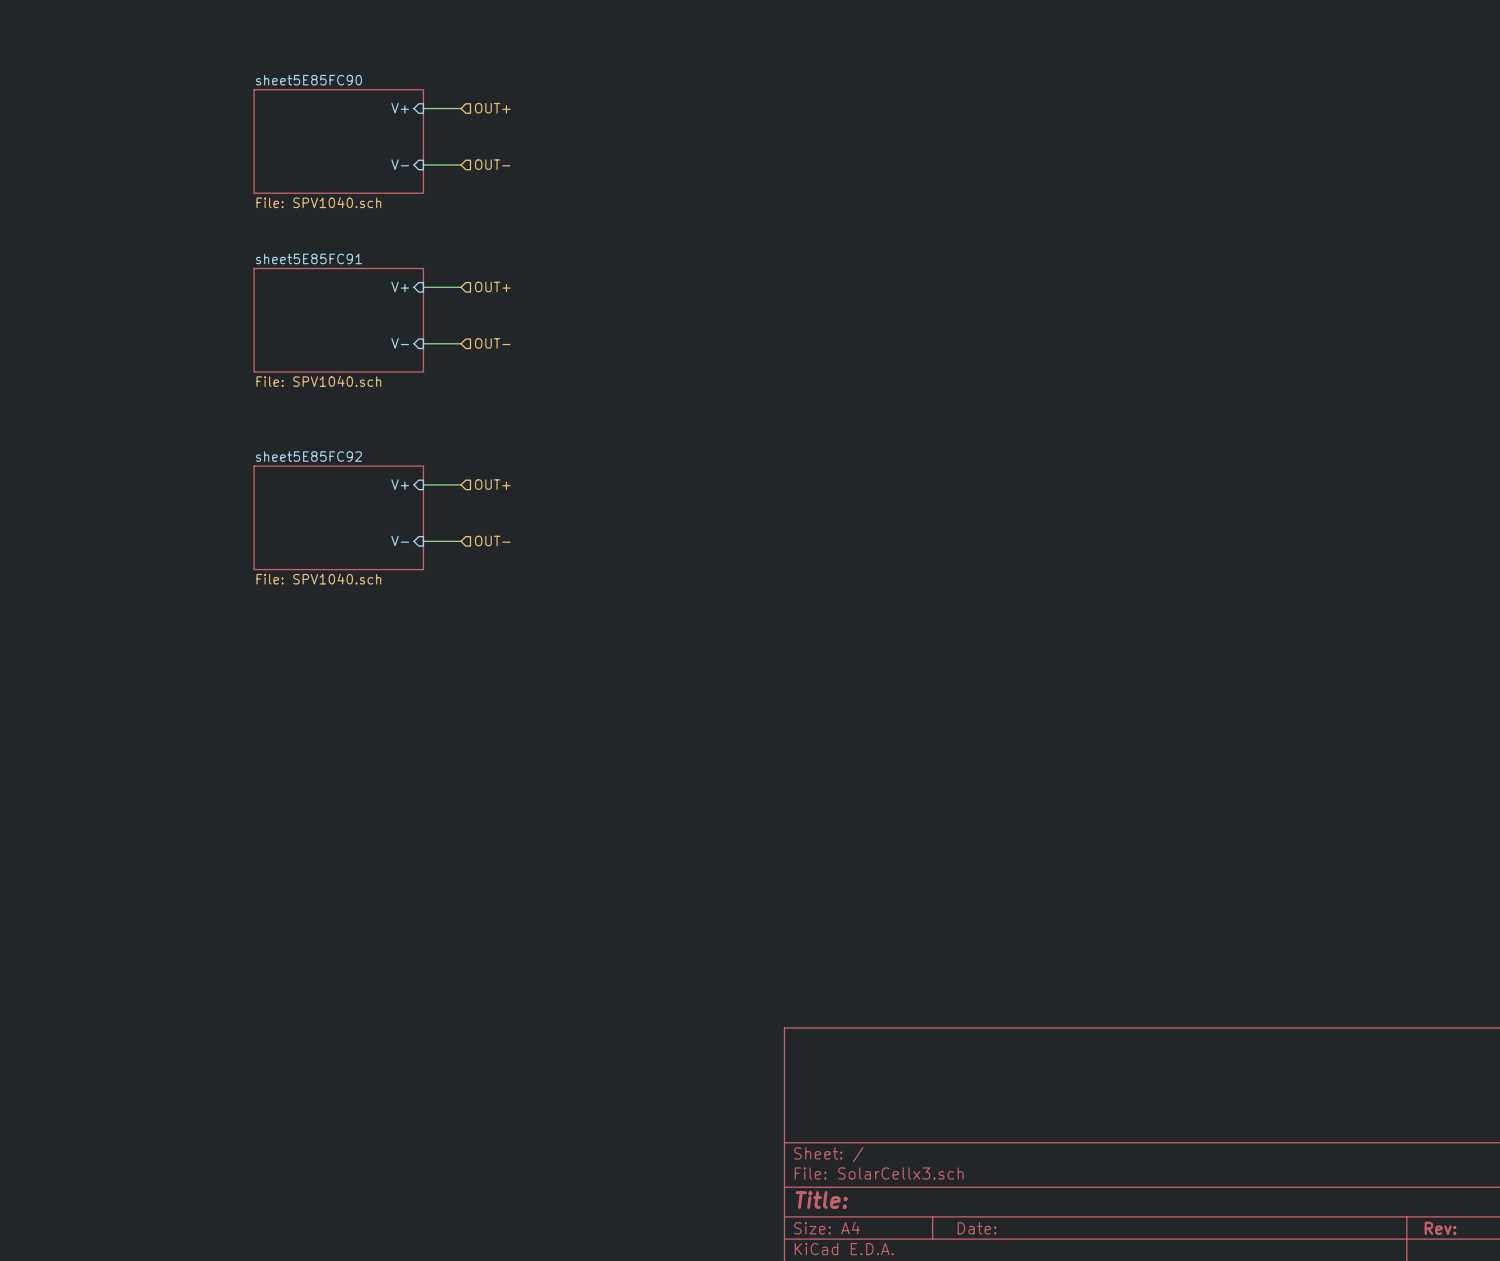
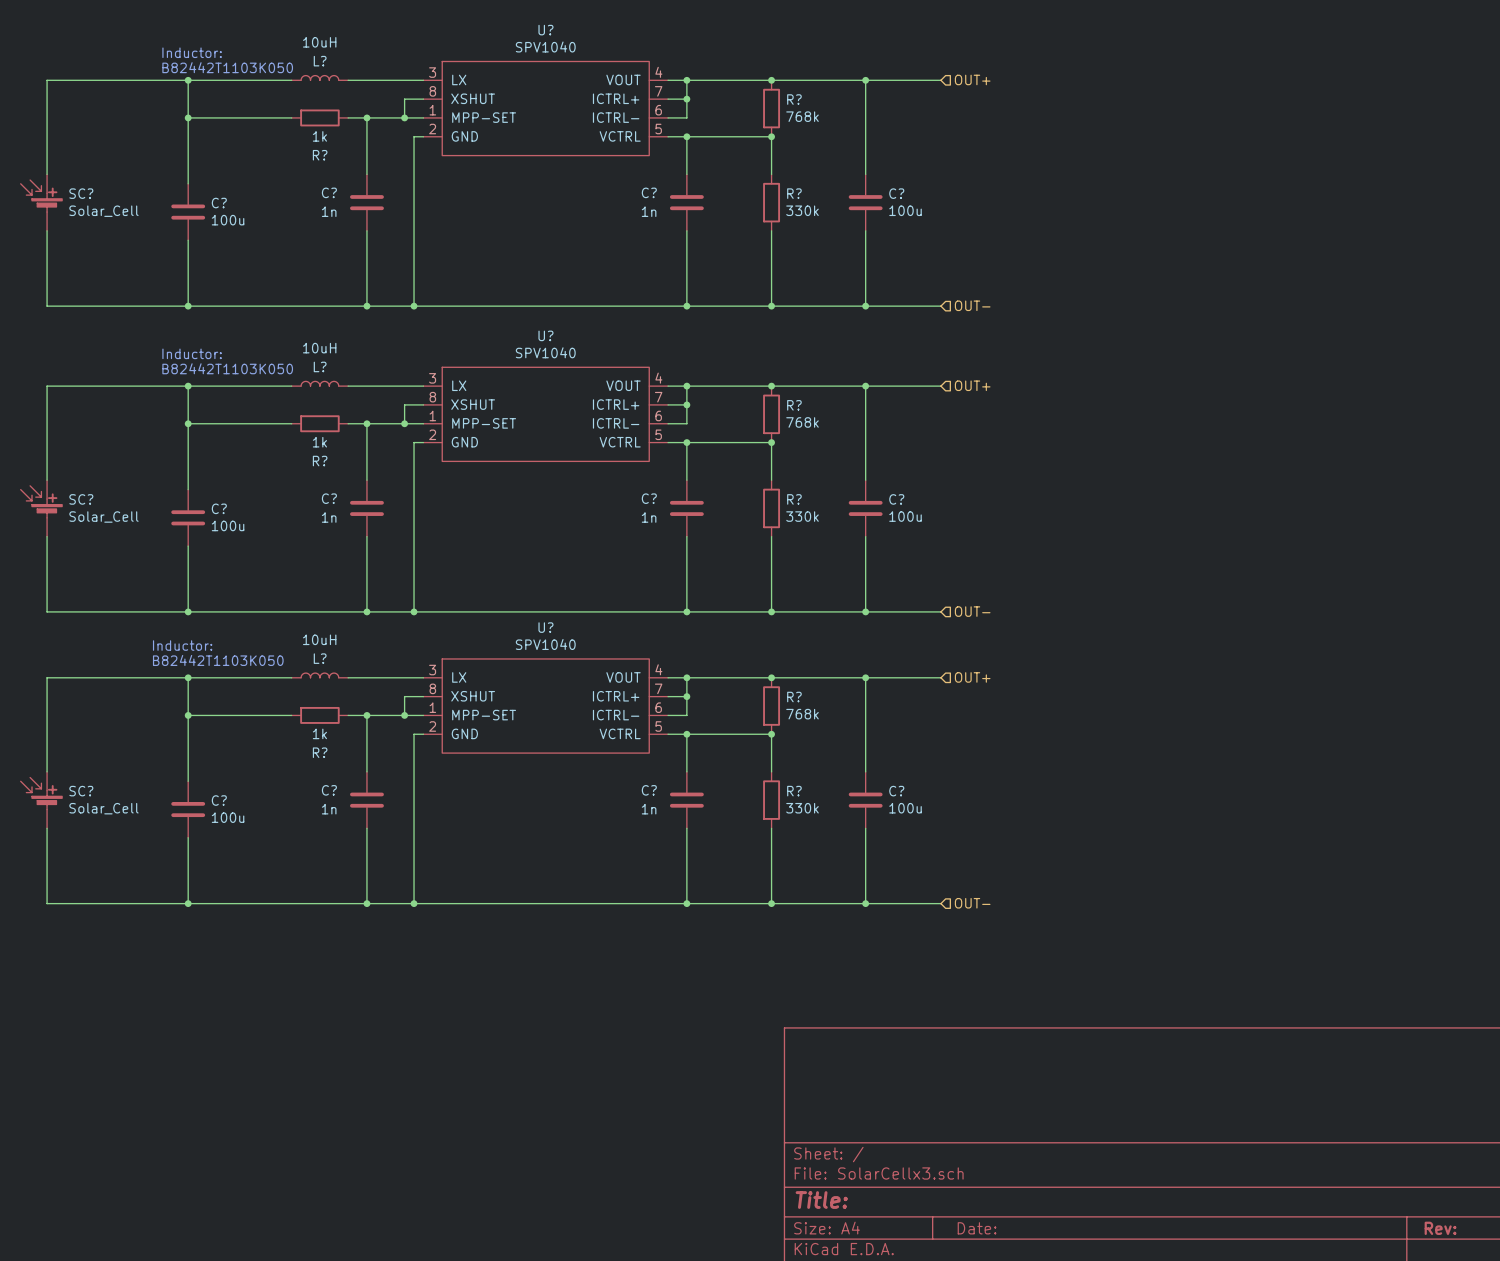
text: none -> Inductor: (192, 52)
text: none -> B82442T1103K050 (227, 67)
L?: none -> 10uH (319, 77)
hierarchical label: none -> OUT+ (972, 79)
wire: none -> (188, 80) (188, 183)
junction: none -> (188, 80)
wire: none -> (291, 80) (47, 80) (47, 174)
wire: none -> (348, 80) (423, 80)
wire: none -> (668, 80) (940, 80)
wire: none -> (686, 80) (686, 117) (668, 117)
junction: none -> (686, 80)
junction: none -> (771, 80)
wire: none -> (865, 80) (865, 174)
junction: none -> (865, 80)
wire: none -> (423, 99) (404, 99) (404, 117)
wire: none -> (668, 99) (686, 99)
junction: none -> (686, 99)
sheet pin: V+ (400, 108) -> none
wire: (423, 108) (461, 108) -> none
hierarchical label: OUT+ (492, 108) -> none
U?: none -> SPV1040 (545, 108)
R?: none -> 768k (771, 108)
wire: none -> (188, 117) (291, 117)
junction: none -> (188, 117)
R?: none -> 1k (319, 117)
wire: none -> (348, 117) (423, 117)
wire: none -> (366, 117) (366, 174)
junction: none -> (366, 117)
junction: none -> (404, 117)
wire: none -> (423, 136) (414, 136) (414, 306)
wire: none -> (668, 136) (771, 136) (771, 174)
wire: none -> (686, 136) (686, 174)
junction: none -> (686, 136)
junction: none -> (771, 136)
sheet sheet5E85FC90: File: SPV1040.sch (338, 141) -> none
sheet pin: V- (400, 164) -> none
hierarchical label: OUT- (492, 164) -> none
wire: (423, 165) (461, 165) -> none
SC?: none -> Solar_Cell (41, 202)
C?: none -> 1n (366, 202)
C?: none -> 1n (686, 202)
R?: none -> 330k (771, 202)
C?: none -> 100u (865, 202)
C?: none -> 100u (188, 212)
wire: none -> (47, 230) (47, 306) (940, 306)
wire: none -> (366, 230) (366, 306)
wire: none -> (686, 230) (686, 306)
wire: none -> (771, 230) (771, 306)
wire: none -> (865, 230) (865, 306)
wire: none -> (188, 240) (188, 306)
sheet pin: V+ (400, 286) -> none
hierarchical label: OUT+ (492, 286) -> none
wire: (423, 287) (461, 287) -> none
hierarchical label: none -> OUT- (972, 305)
junction: none -> (188, 306)
junction: none -> (366, 306)
junction: none -> (414, 306)
junction: none -> (686, 306)
junction: none -> (771, 306)
junction: none -> (865, 306)
sheet sheet5E85FC91: File: SPV1040.sch (338, 320) -> none
sheet pin: V- (400, 343) -> none
wire: (423, 343) (461, 343) -> none
hierarchical label: OUT- (492, 343) -> none
text: none -> Inductor: (192, 353)
text: none -> B82442T1103K050 (227, 368)
L?: none -> 10uH (319, 383)
hierarchical label: none -> OUT+ (972, 385)
wire: none -> (188, 386) (188, 489)
junction: none -> (188, 386)
wire: none -> (291, 386) (47, 386) (47, 480)
wire: none -> (348, 386) (423, 386)
wire: none -> (668, 386) (940, 386)
wire: none -> (686, 386) (686, 423) (668, 423)
junction: none -> (686, 386)
junction: none -> (771, 386)
wire: none -> (865, 386) (865, 480)
junction: none -> (865, 386)
wire: none -> (423, 404) (404, 404) (404, 423)
wire: none -> (668, 404) (686, 404)
junction: none -> (686, 404)
U?: none -> SPV1040 (545, 414)
R?: none -> 768k (771, 414)
wire: none -> (188, 423) (291, 423)
junction: none -> (188, 423)
R?: none -> 1k (319, 423)
wire: none -> (348, 423) (423, 423)
wire: none -> (366, 423) (366, 480)
junction: none -> (366, 423)
junction: none -> (404, 423)
wire: none -> (423, 442) (414, 442) (414, 611)
wire: none -> (668, 442) (771, 442) (771, 480)
wire: none -> (686, 442) (686, 480)
junction: none -> (686, 442)
junction: none -> (771, 442)
sheet pin: V+ (400, 484) -> none
wire: (423, 484) (461, 484) -> none
hierarchical label: OUT+ (492, 484) -> none
SC?: none -> Solar_Cell (41, 508)
C?: none -> 1n (366, 508)
C?: none -> 1n (686, 508)
R?: none -> 330k (771, 508)
C?: none -> 100u (865, 508)
C?: none -> 100u (188, 517)
sheet sheet5E85FC92: File: SPV1040.sch (338, 517) -> none
wire: none -> (47, 536) (47, 611) (940, 611)
wire: none -> (366, 536) (366, 611)
wire: none -> (686, 536) (686, 611)
wire: none -> (771, 536) (771, 611)
wire: none -> (865, 536) (865, 611)
sheet pin: V- (400, 541) -> none
wire: (423, 541) (461, 541) -> none
hierarchical label: OUT- (492, 541) -> none
wire: none -> (188, 546) (188, 611)
junction: none -> (188, 611)
junction: none -> (366, 611)
junction: none -> (414, 611)
junction: none -> (686, 611)
junction: none -> (771, 611)
junction: none -> (865, 611)
hierarchical label: none -> OUT- (972, 611)
text: none -> Inductor: (182, 645)
text: none -> B82442T1103K050 (218, 660)
L?: none -> 10uH (319, 675)
wire: none -> (188, 677) (188, 781)
junction: none -> (188, 677)
wire: none -> (291, 677) (47, 677) (47, 771)
wire: none -> (348, 677) (423, 677)
wire: none -> (668, 677) (940, 677)
wire: none -> (686, 677) (686, 715) (668, 715)
junction: none -> (686, 677)
junction: none -> (771, 677)
wire: none -> (865, 677) (865, 771)
junction: none -> (865, 677)
hierarchical label: none -> OUT+ (972, 677)
wire: none -> (423, 696) (404, 696) (404, 715)
wire: none -> (668, 696) (686, 696)
junction: none -> (686, 696)
U?: none -> SPV1040 (545, 706)
R?: none -> 768k (771, 706)
wire: none -> (188, 715) (291, 715)
junction: none -> (188, 715)
R?: none -> 1k (319, 715)
wire: none -> (348, 715) (423, 715)
wire: none -> (366, 715) (366, 771)
junction: none -> (366, 715)
junction: none -> (404, 715)
wire: none -> (423, 734) (414, 734) (414, 903)
wire: none -> (668, 734) (771, 734) (771, 771)
wire: none -> (686, 734) (686, 771)
junction: none -> (686, 734)
junction: none -> (771, 734)
SC?: none -> Solar_Cell (41, 800)
C?: none -> 1n (366, 800)
C?: none -> 1n (686, 800)
R?: none -> 330k (771, 800)
C?: none -> 100u (865, 800)
C?: none -> 100u (188, 809)
wire: none -> (47, 828) (47, 903) (940, 903)
wire: none -> (366, 828) (366, 903)
wire: none -> (686, 828) (686, 903)
wire: none -> (771, 828) (771, 903)
wire: none -> (865, 828) (865, 903)
wire: none -> (188, 837) (188, 903)
junction: none -> (188, 903)
junction: none -> (366, 903)
junction: none -> (414, 903)
junction: none -> (686, 903)
junction: none -> (771, 903)
junction: none -> (865, 903)
hierarchical label: none -> OUT- (972, 903)

